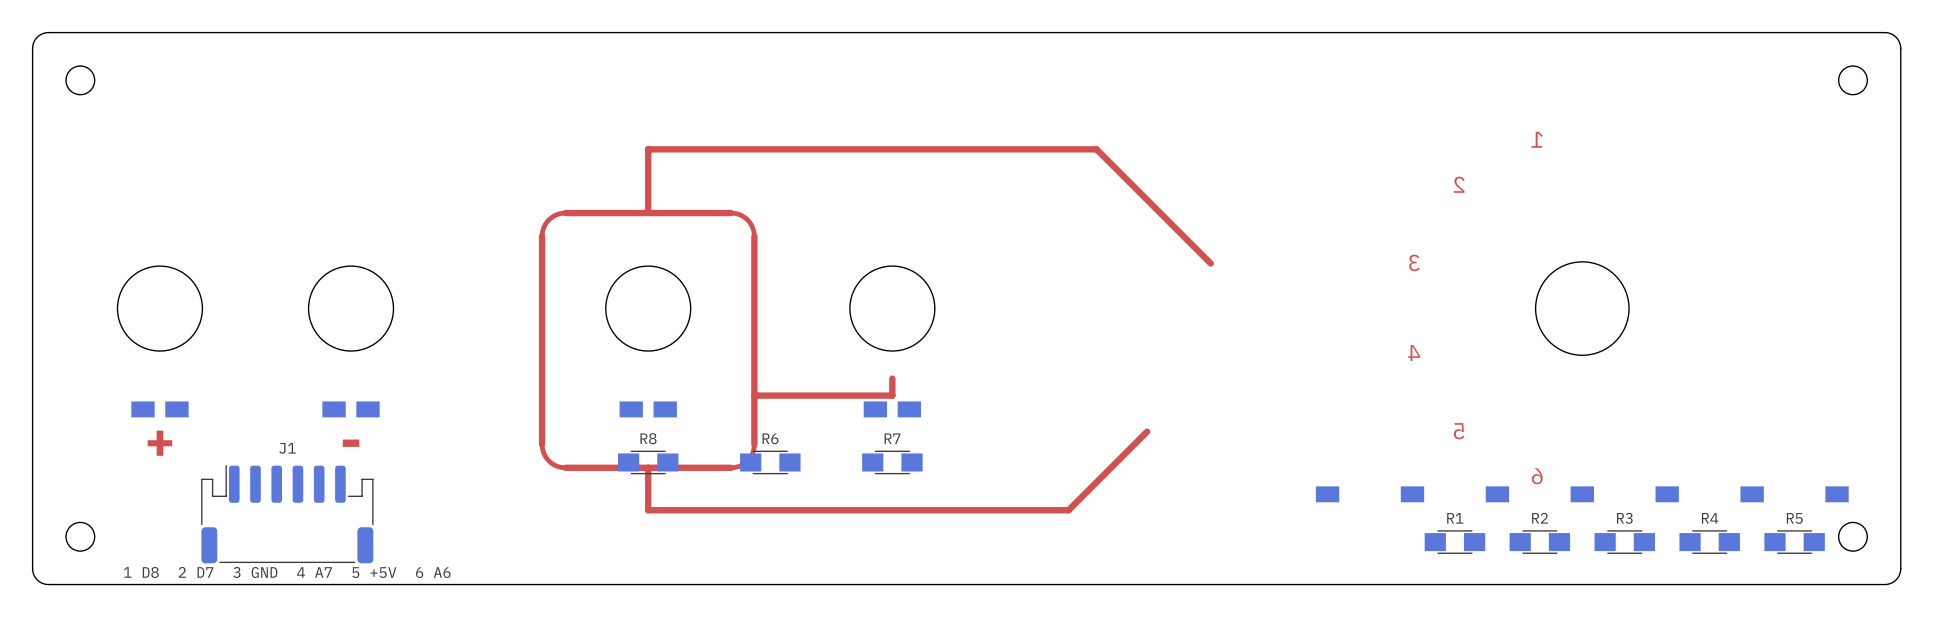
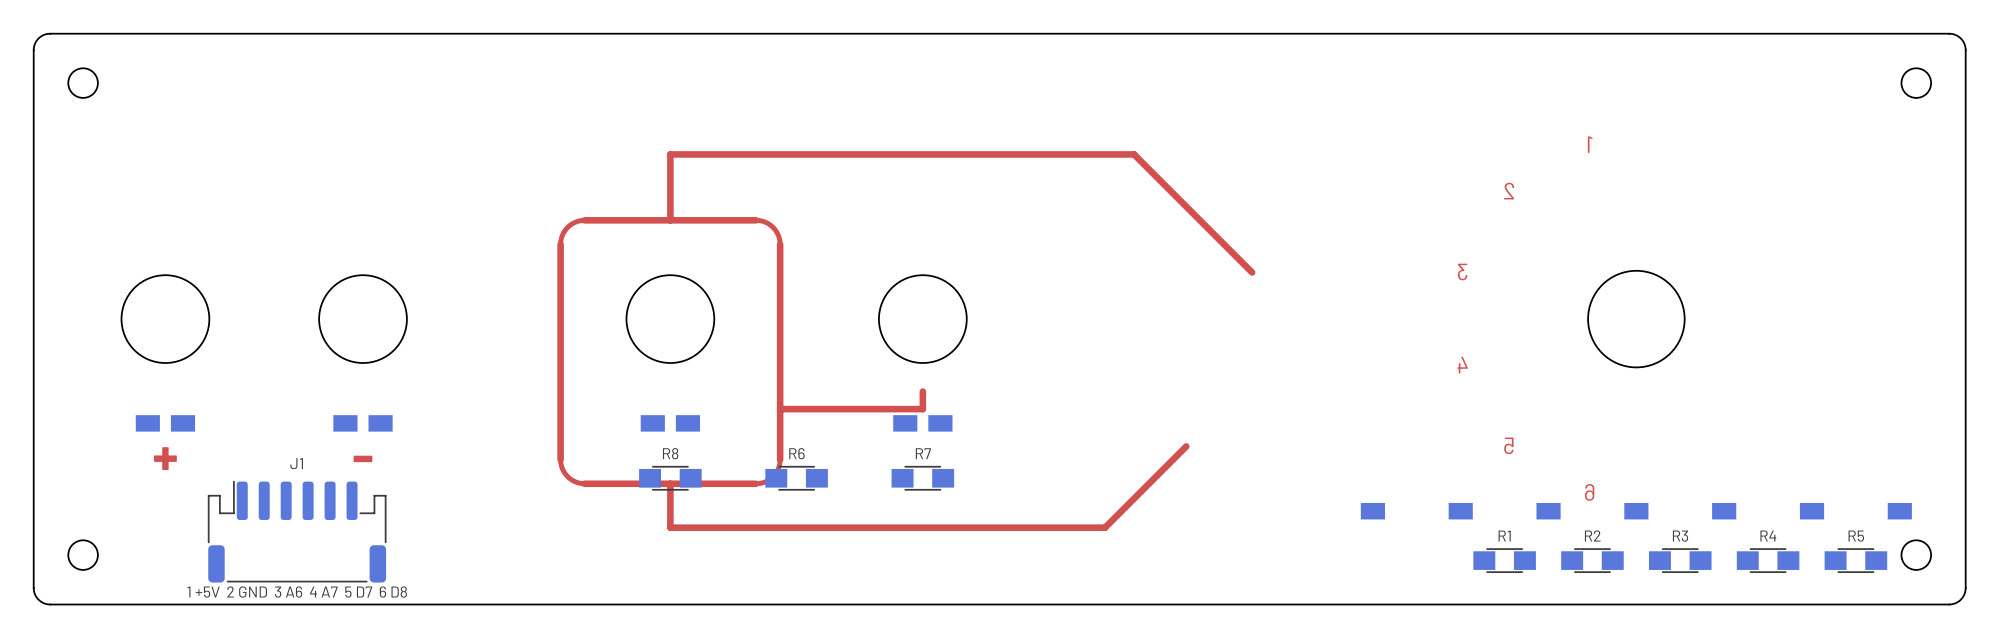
text: 1 D8 2 D7 3 GND 4 A7 5 +5V 6 A6 (287, 572) -> 1 +5V 2 GND 3 A6 4 A7 5 D7 6 D8 (297, 592)

